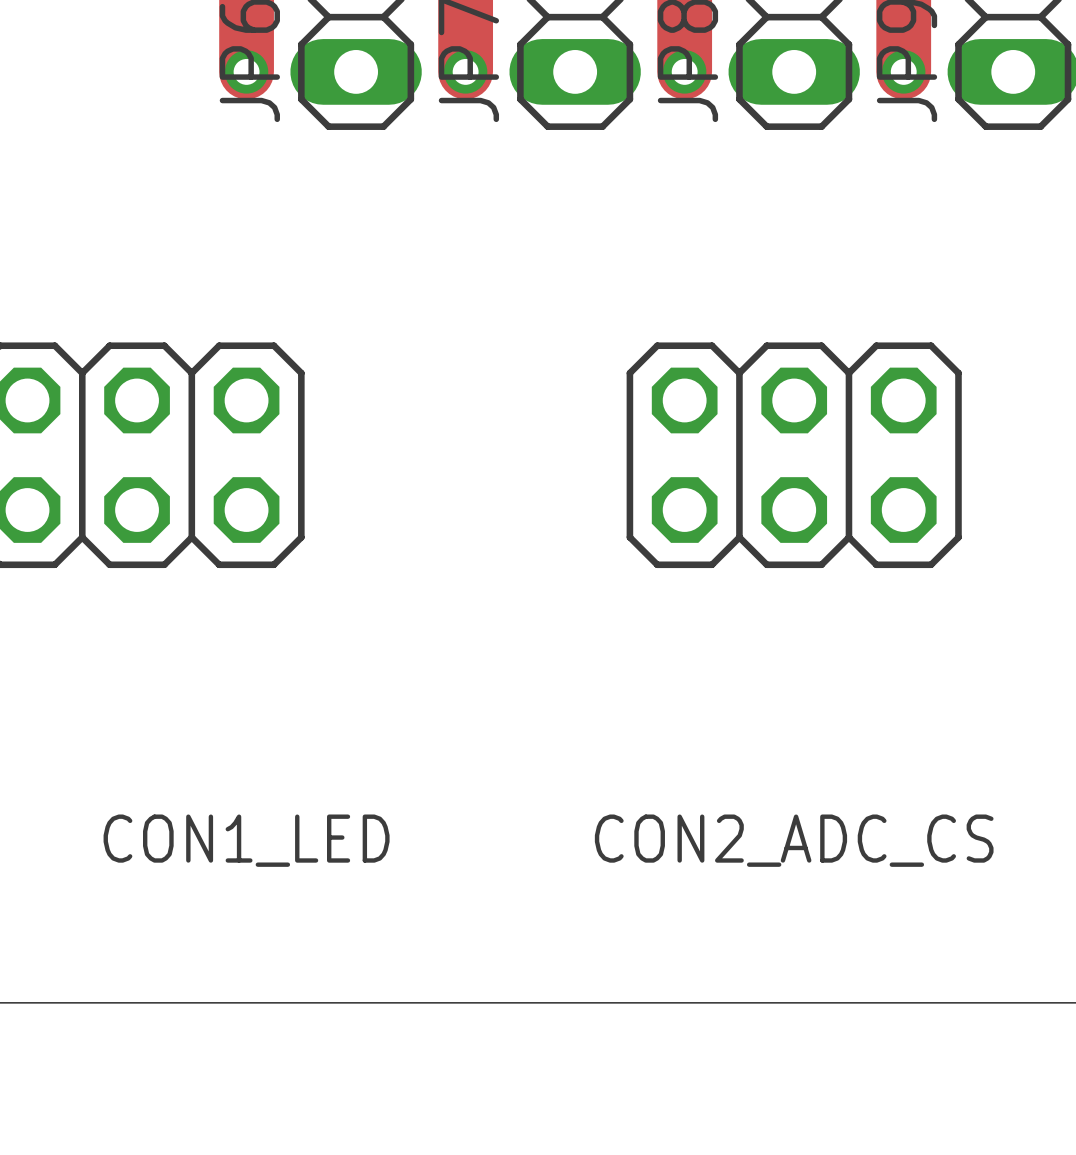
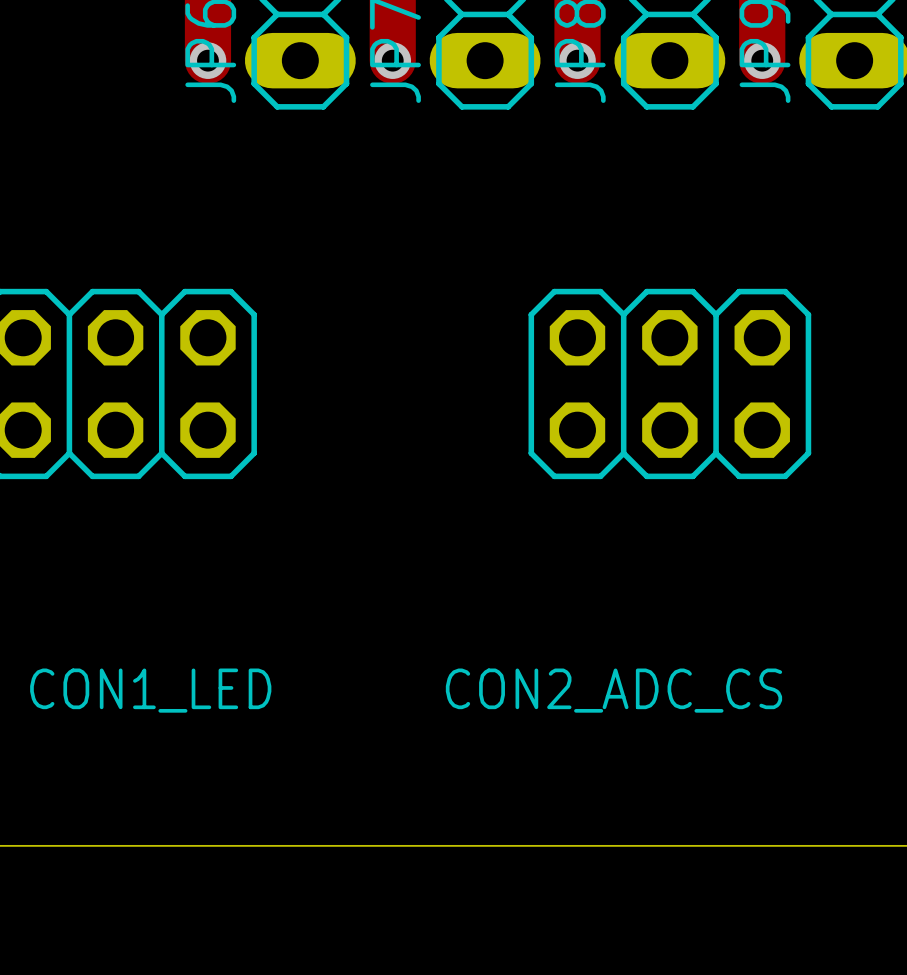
CON1_LED name position: CON1_LED (246, 840) -> CON1_LED (150, 690)
CON2_ADC_CS name position: CON2_ADC_CS (794, 840) -> CON2_ADC_CS (613, 690)

